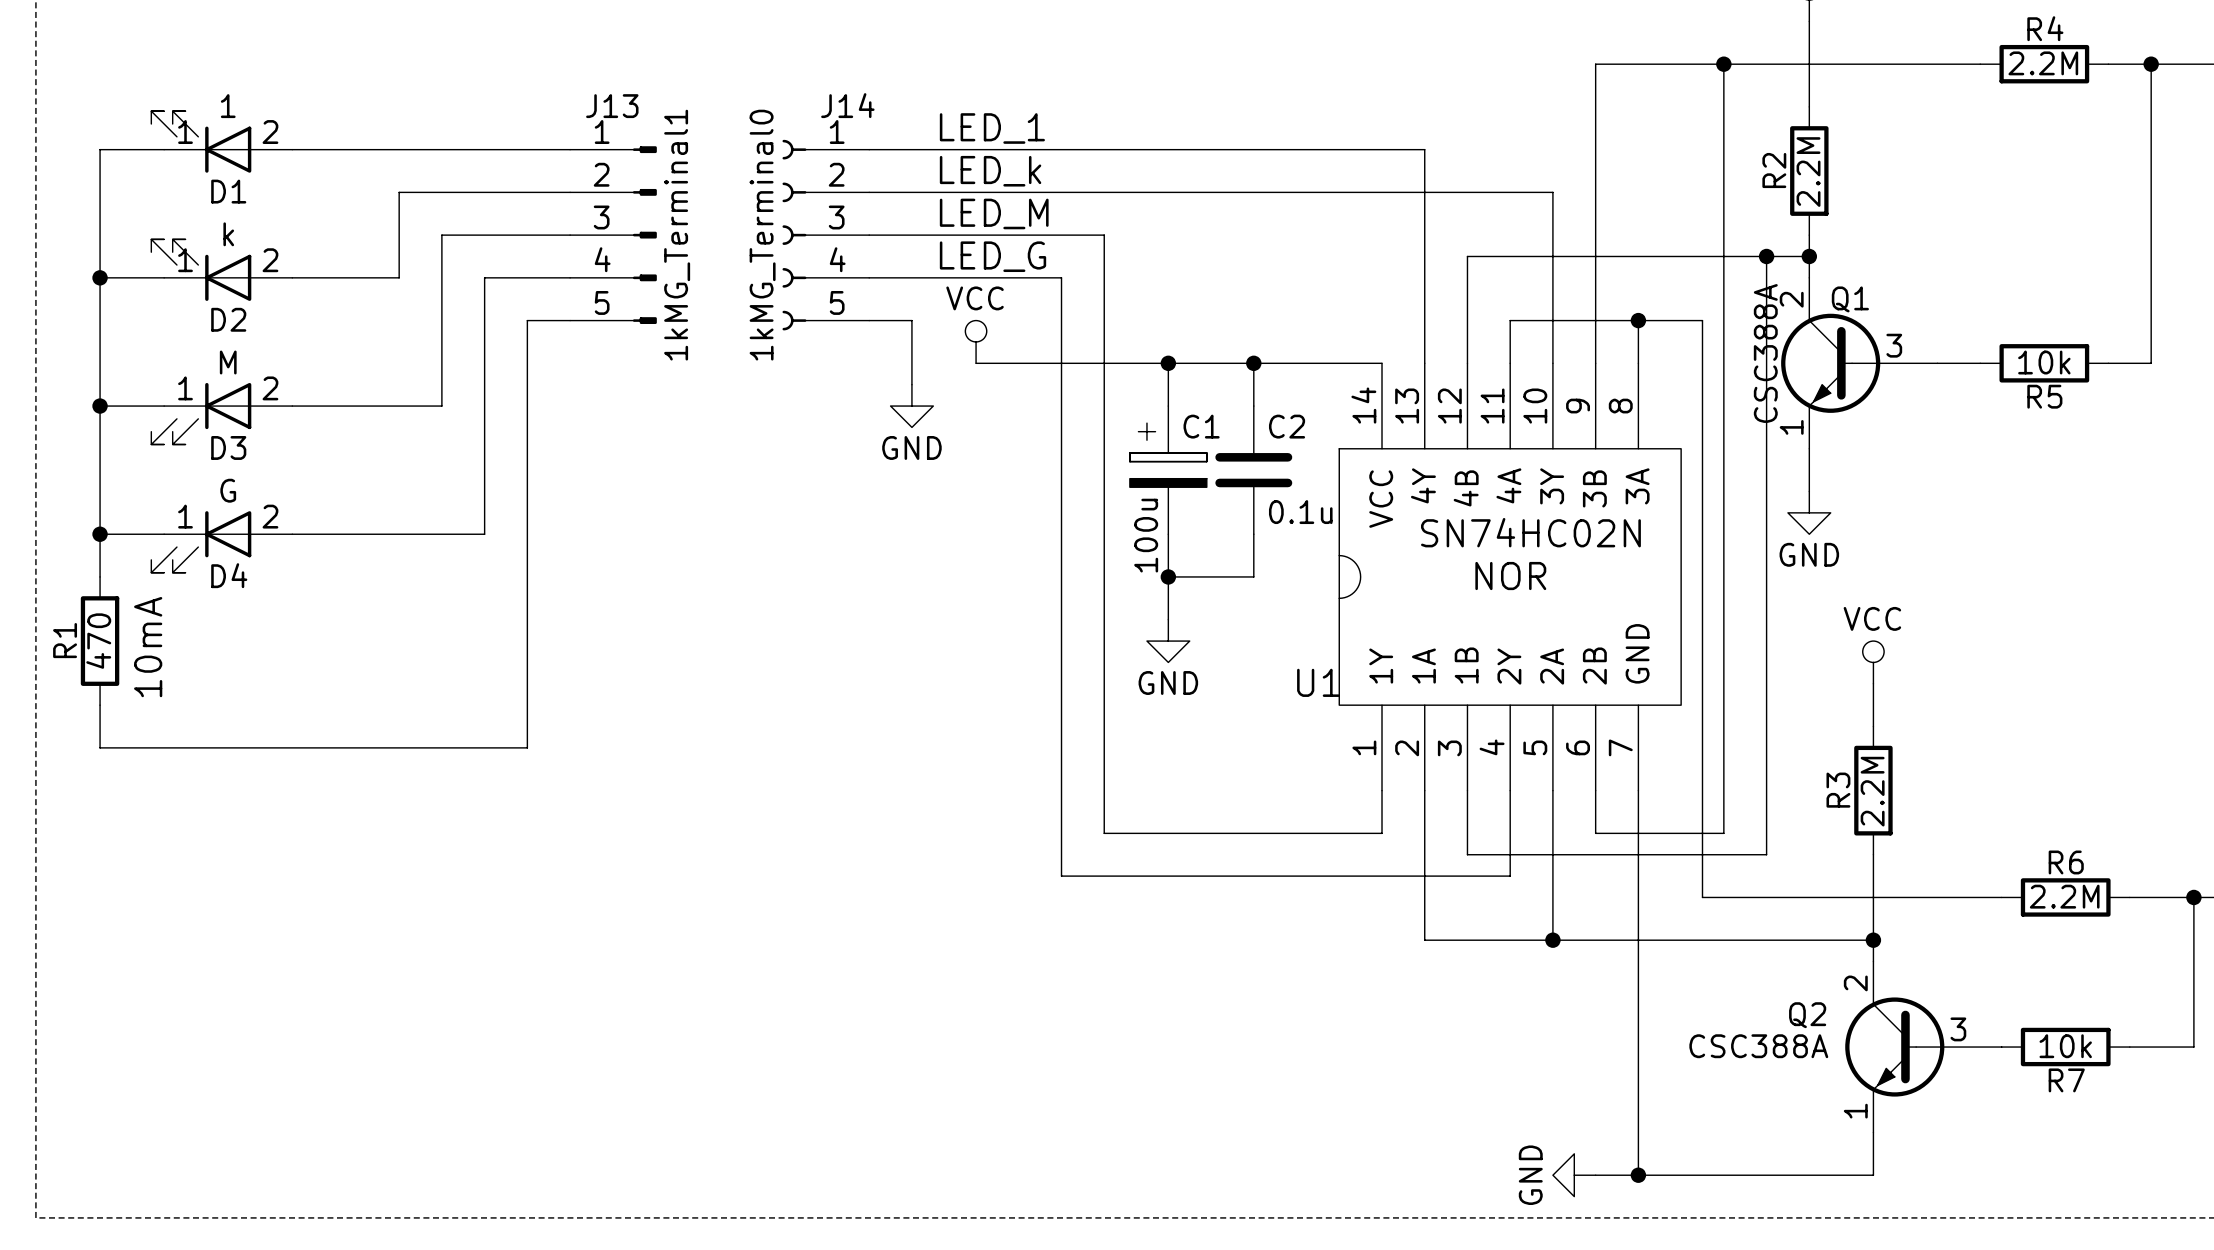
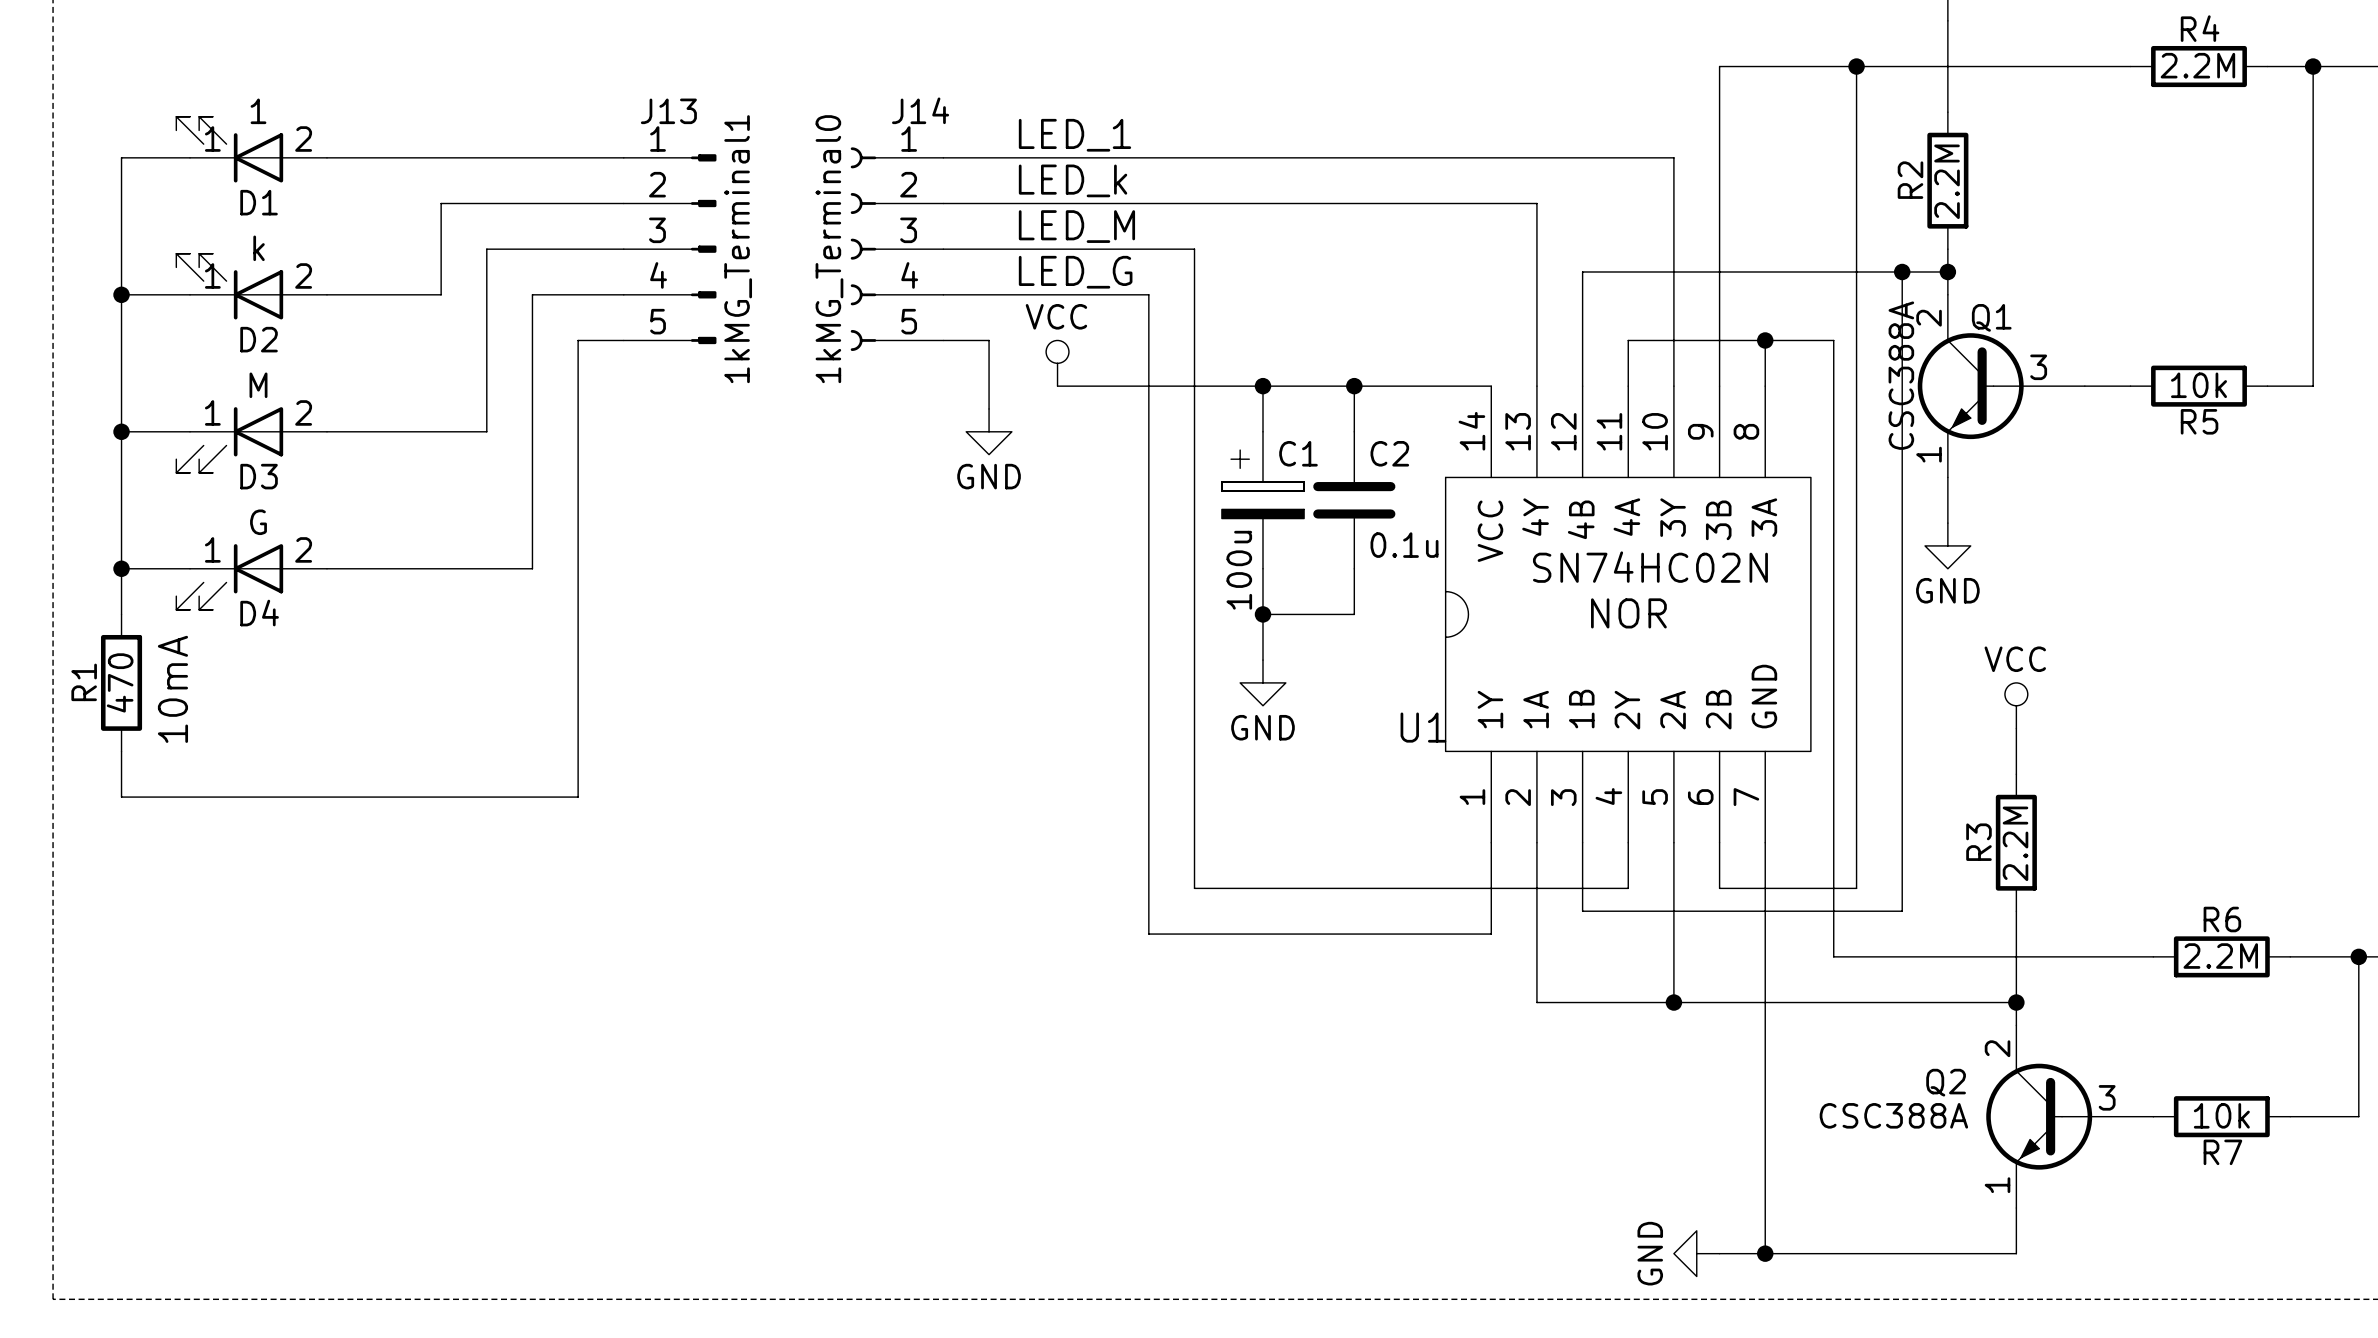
wire: (1424, 149) (1424, 192) (1552, 192) -> (1536, 157) (1673, 157) (1673, 203)
wire: (1510, 833) (1510, 876) (1382, 876) -> (1628, 888) (1491, 888) (1491, 934)

